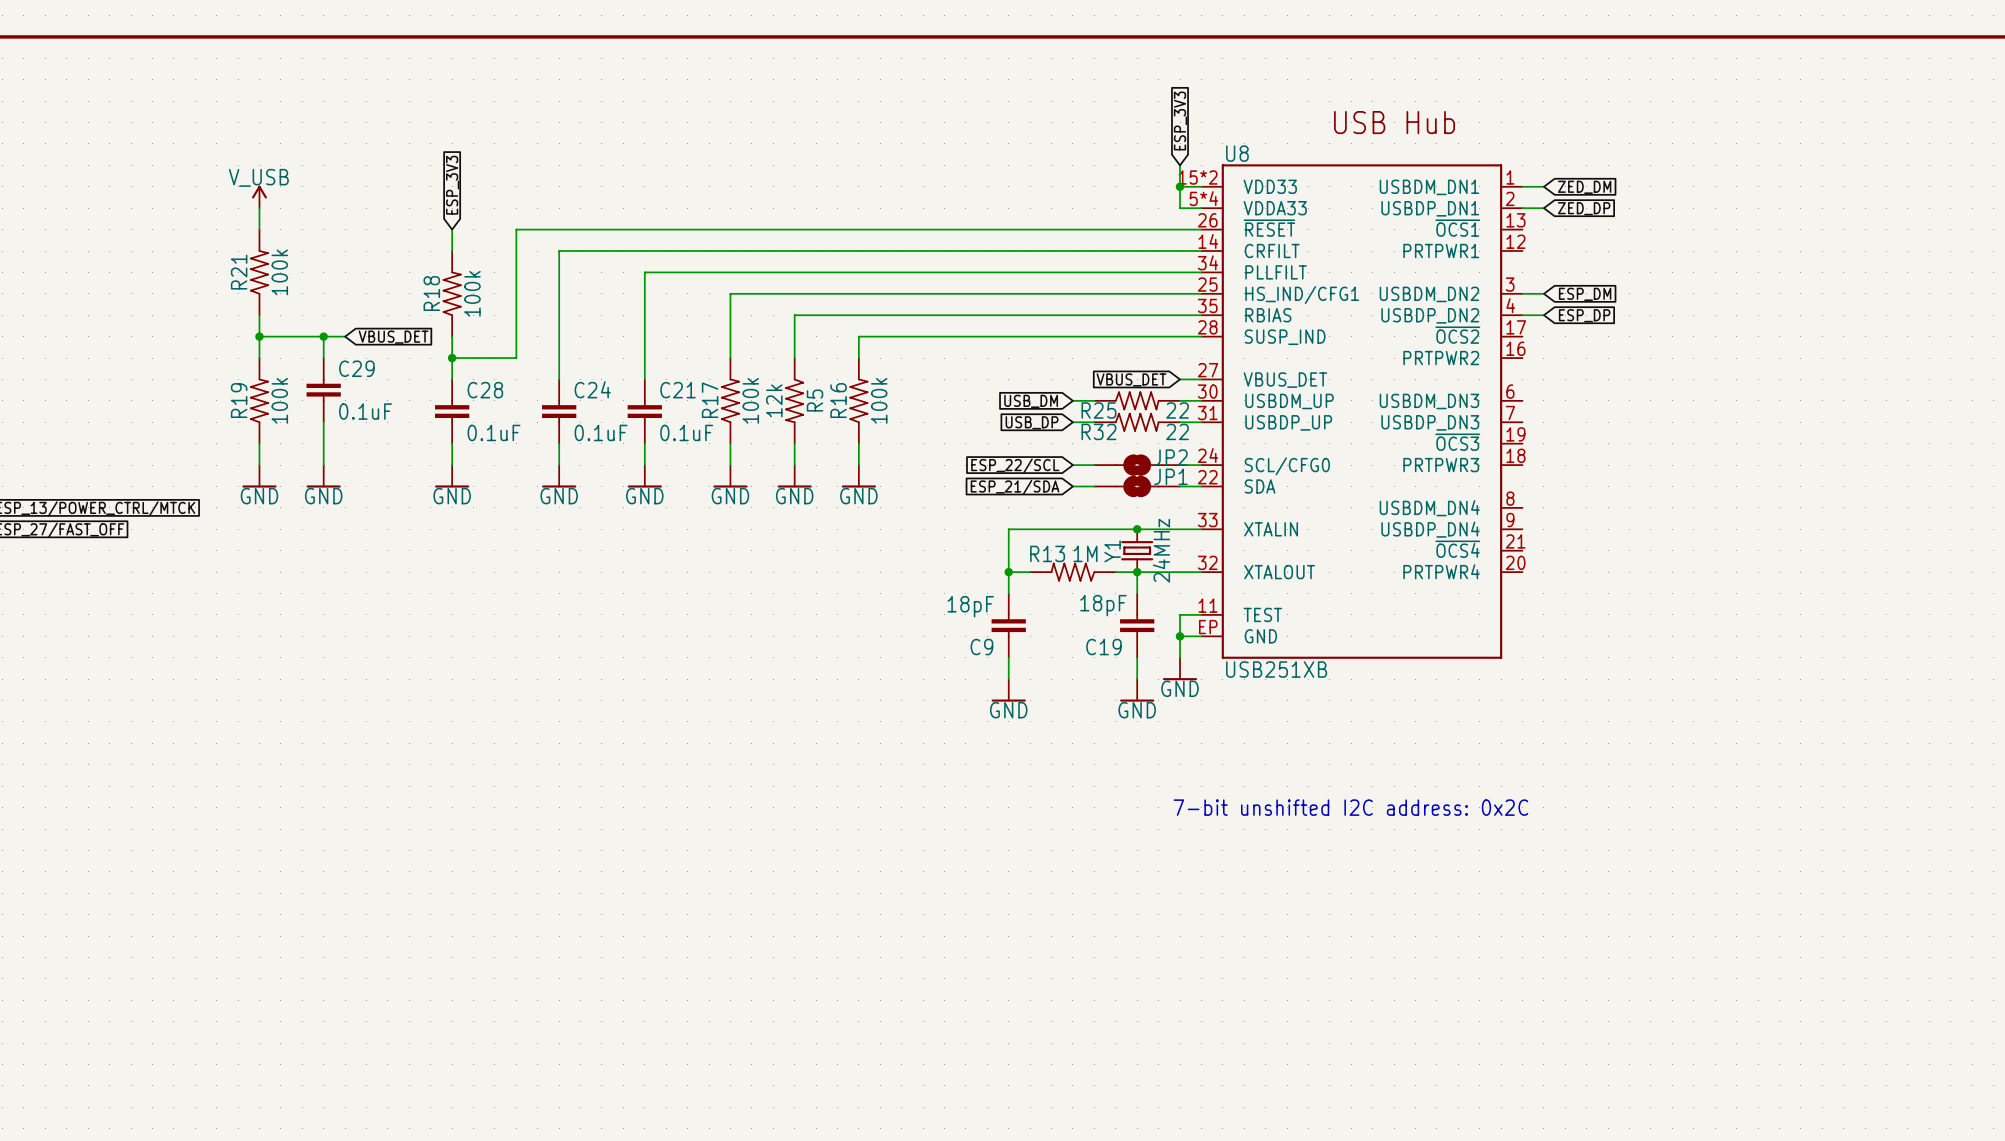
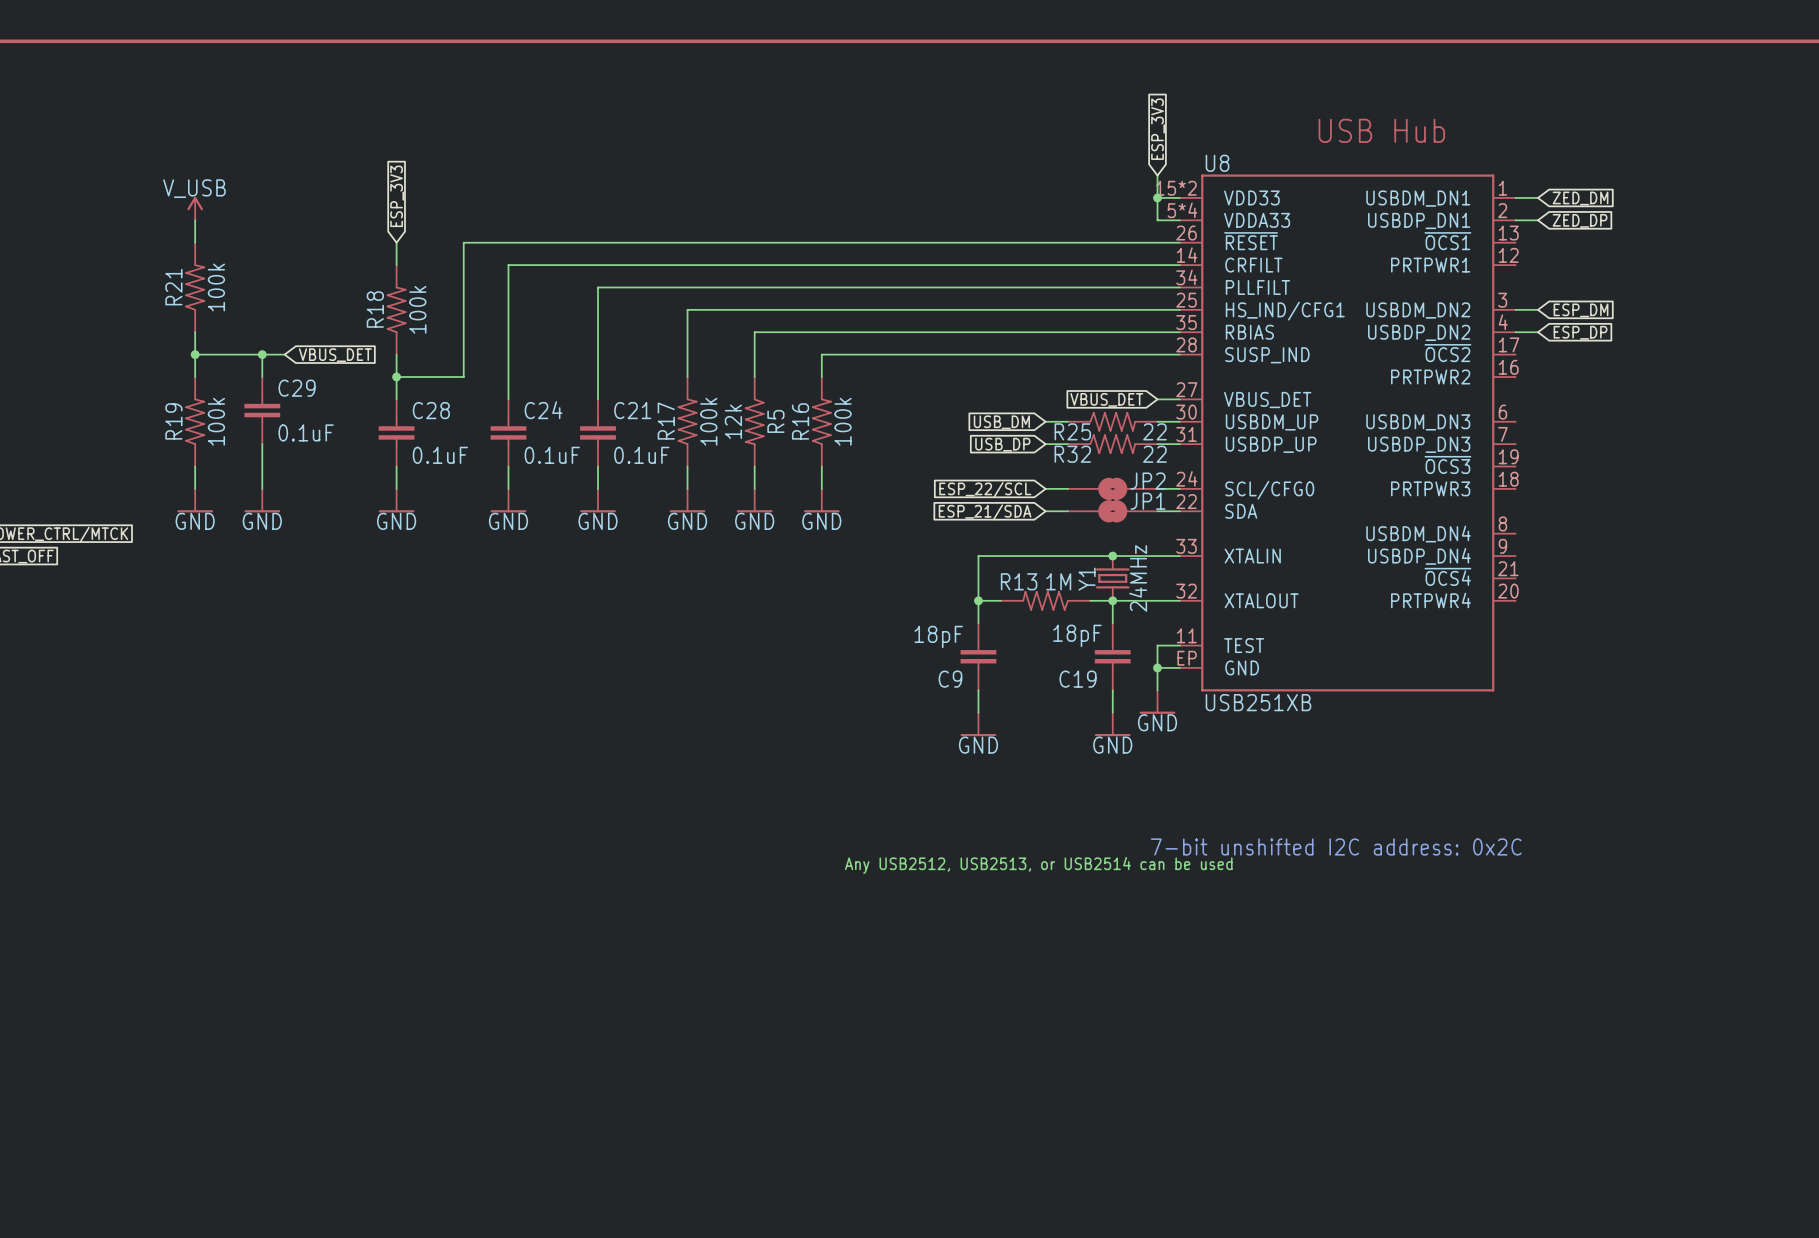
text: none -> Any USB2512, USB2513, or USB2514 can be used (1038, 865)

